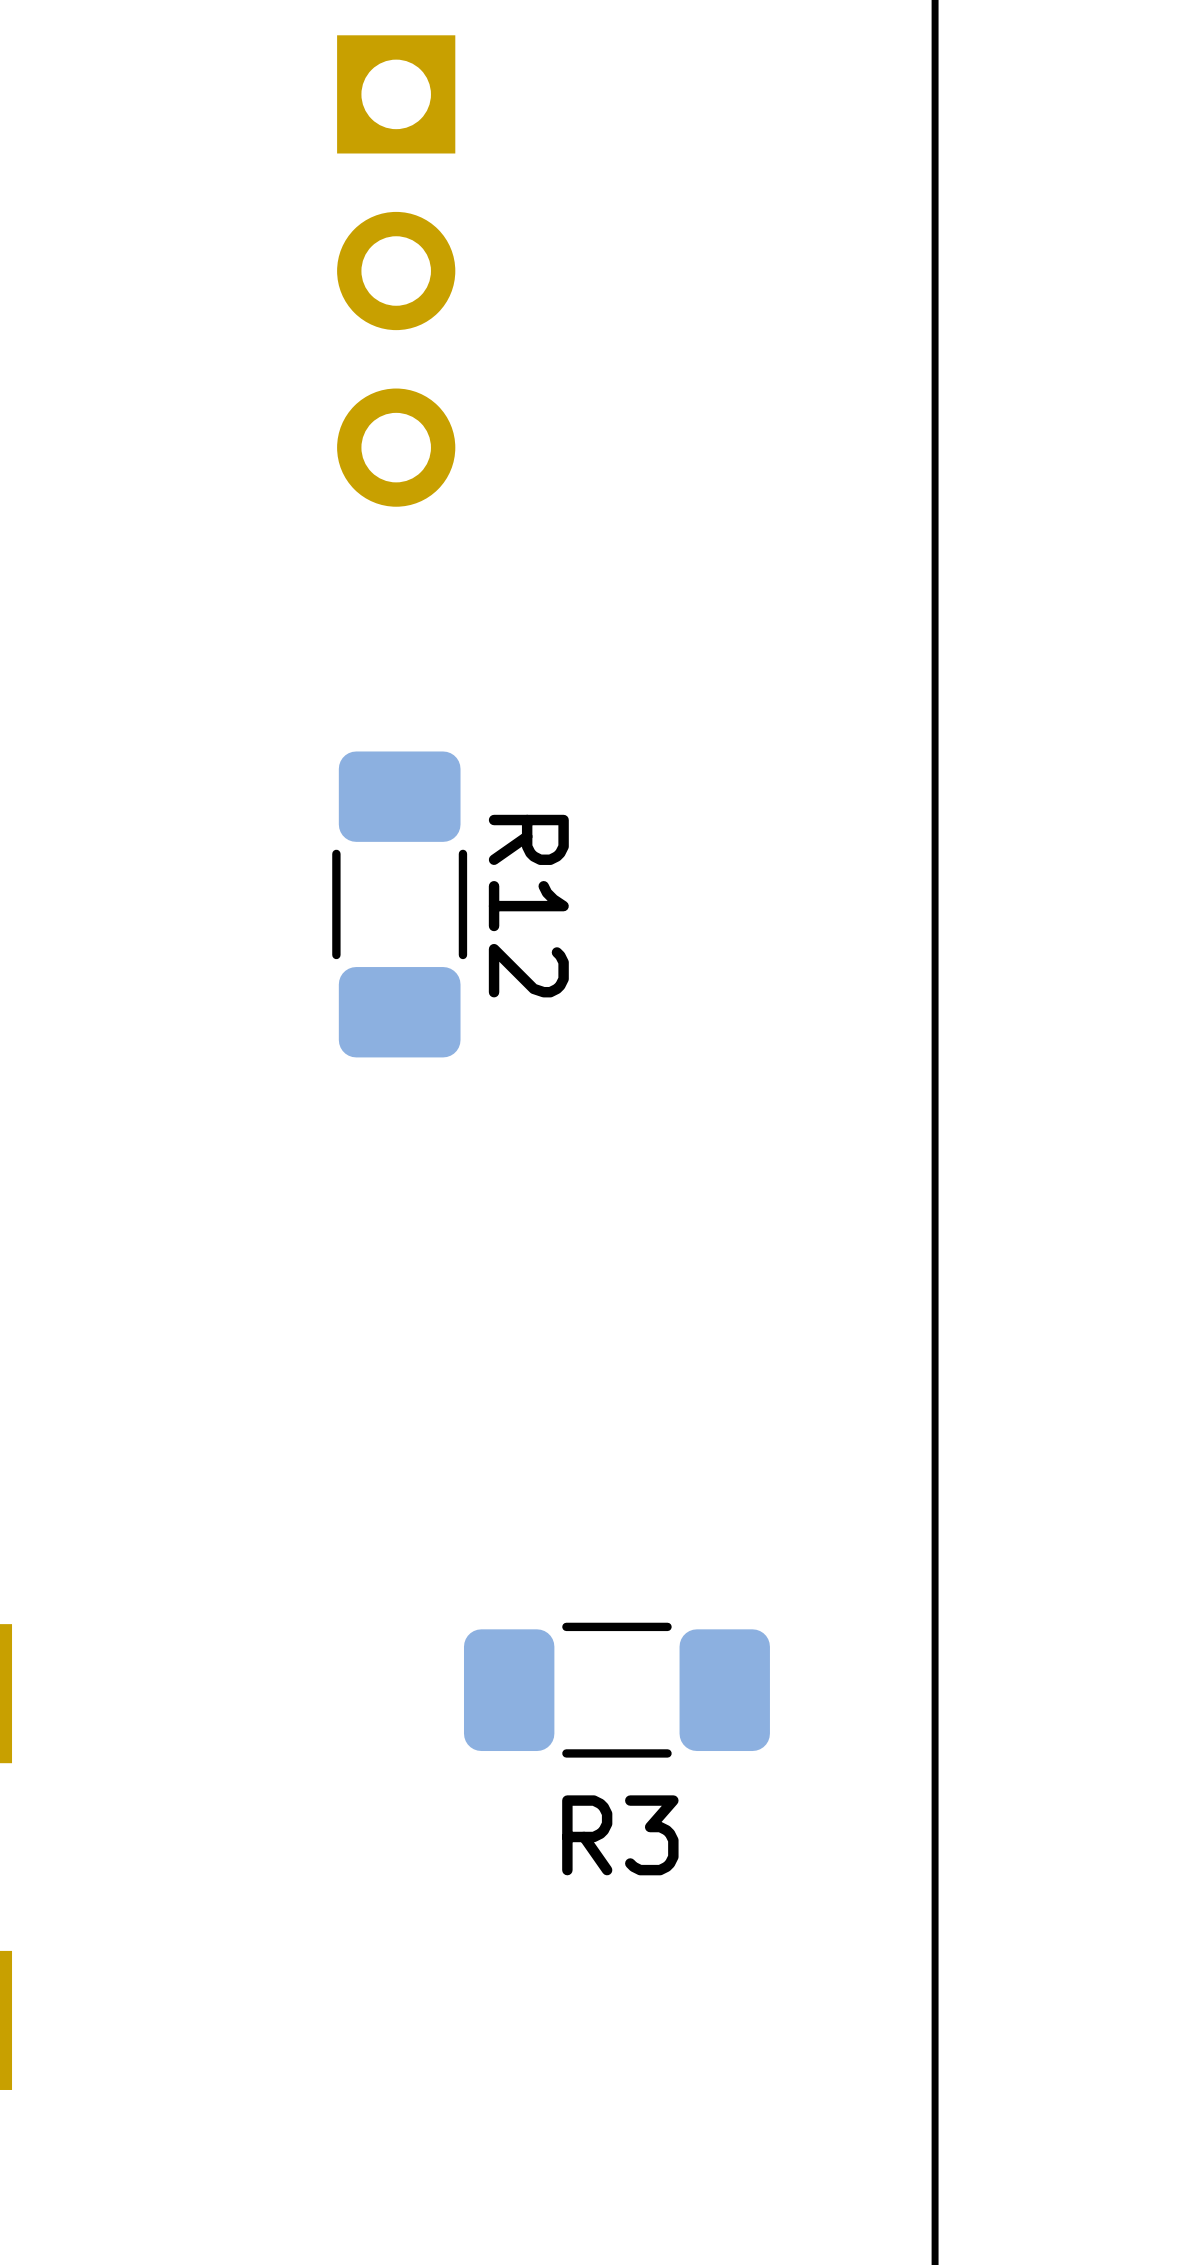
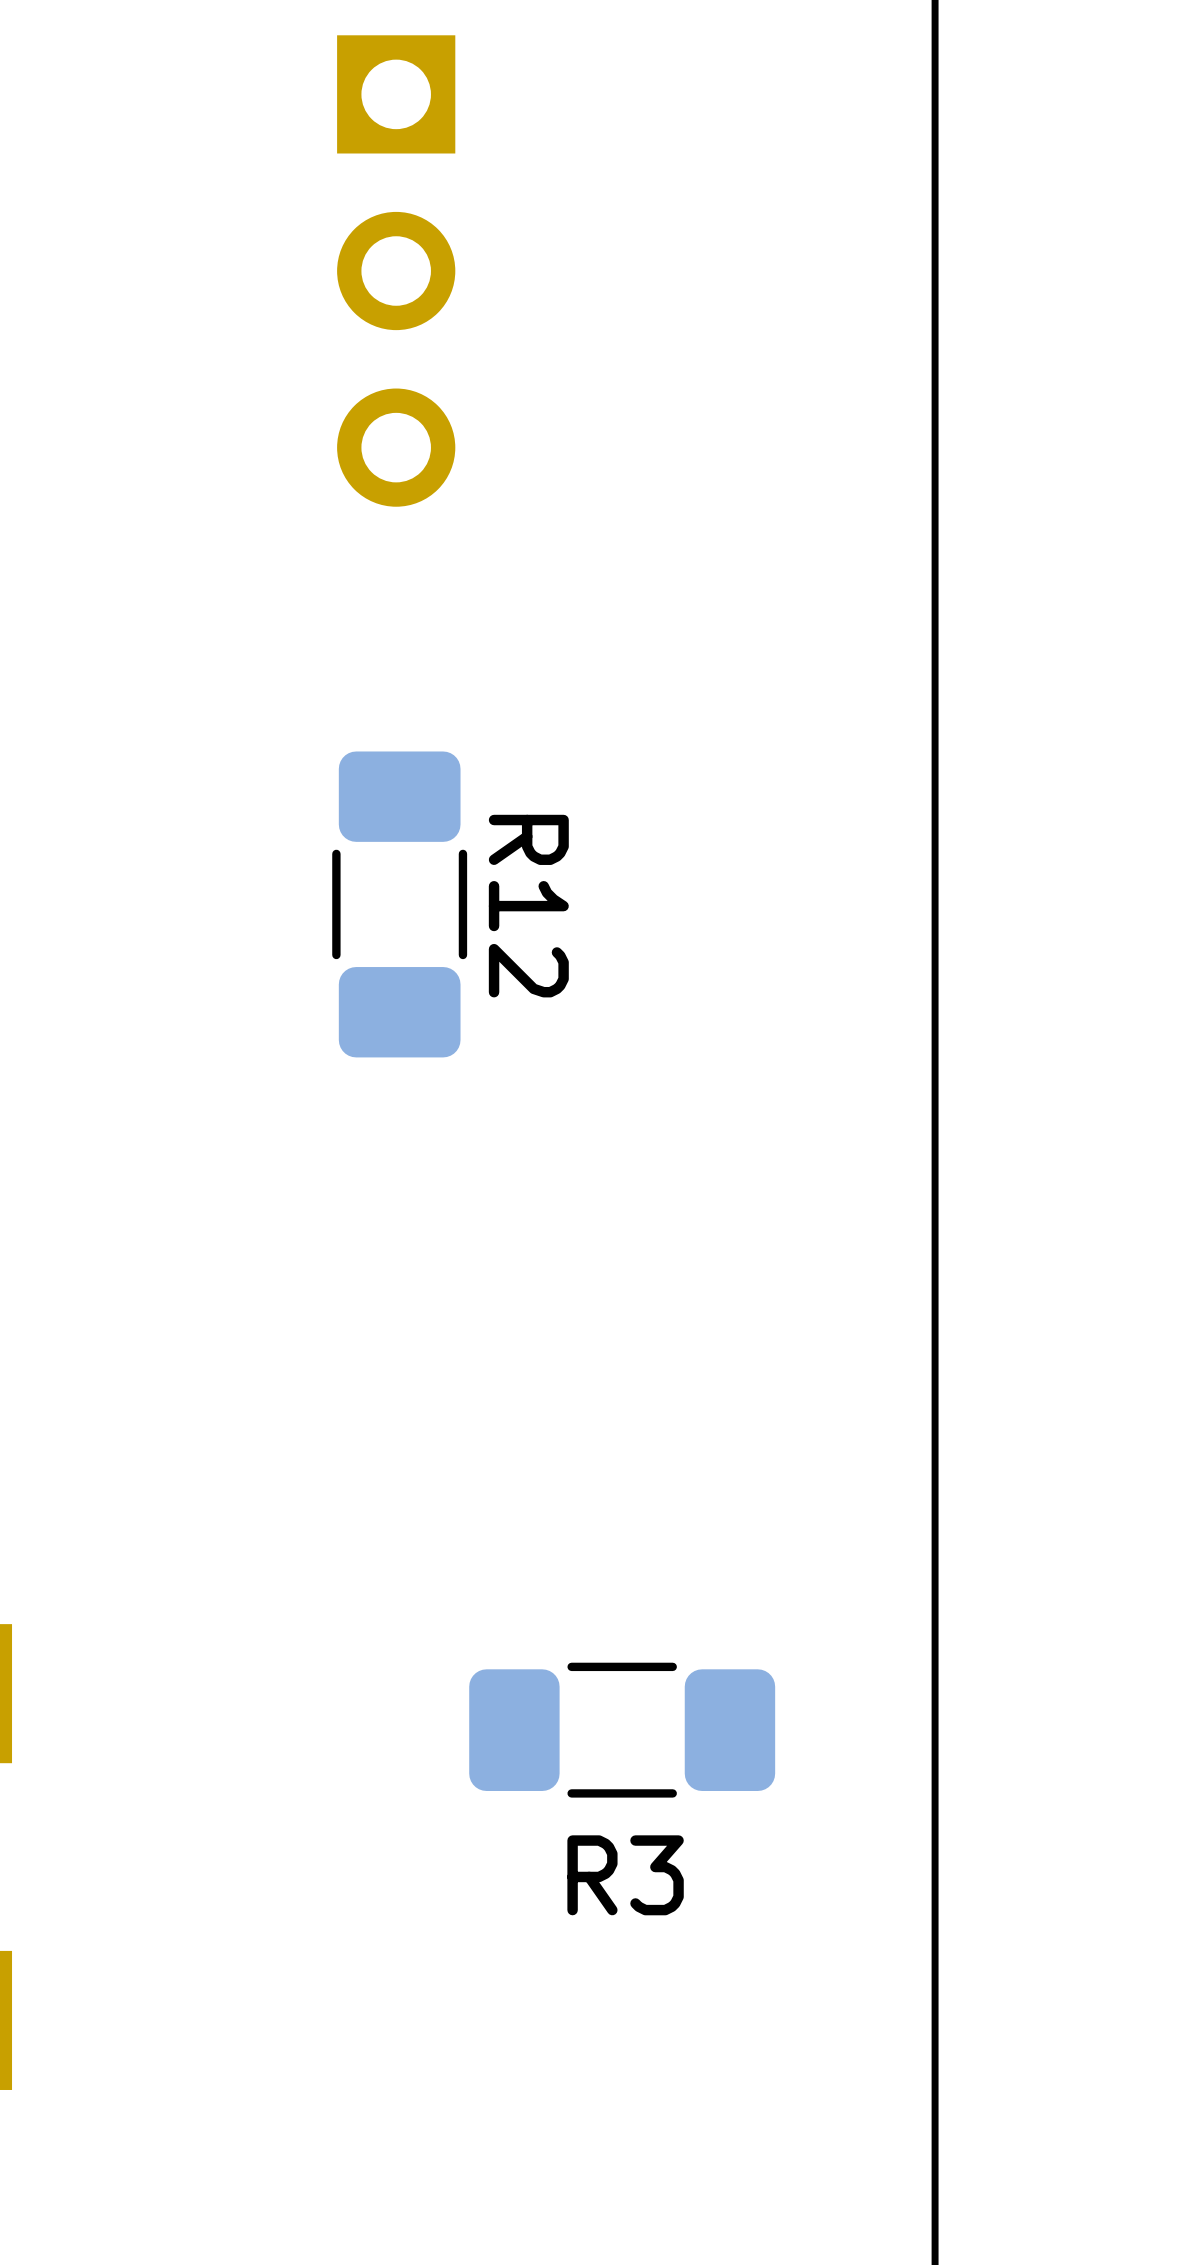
R3 position: (616, 1690) -> (622, 1730)

